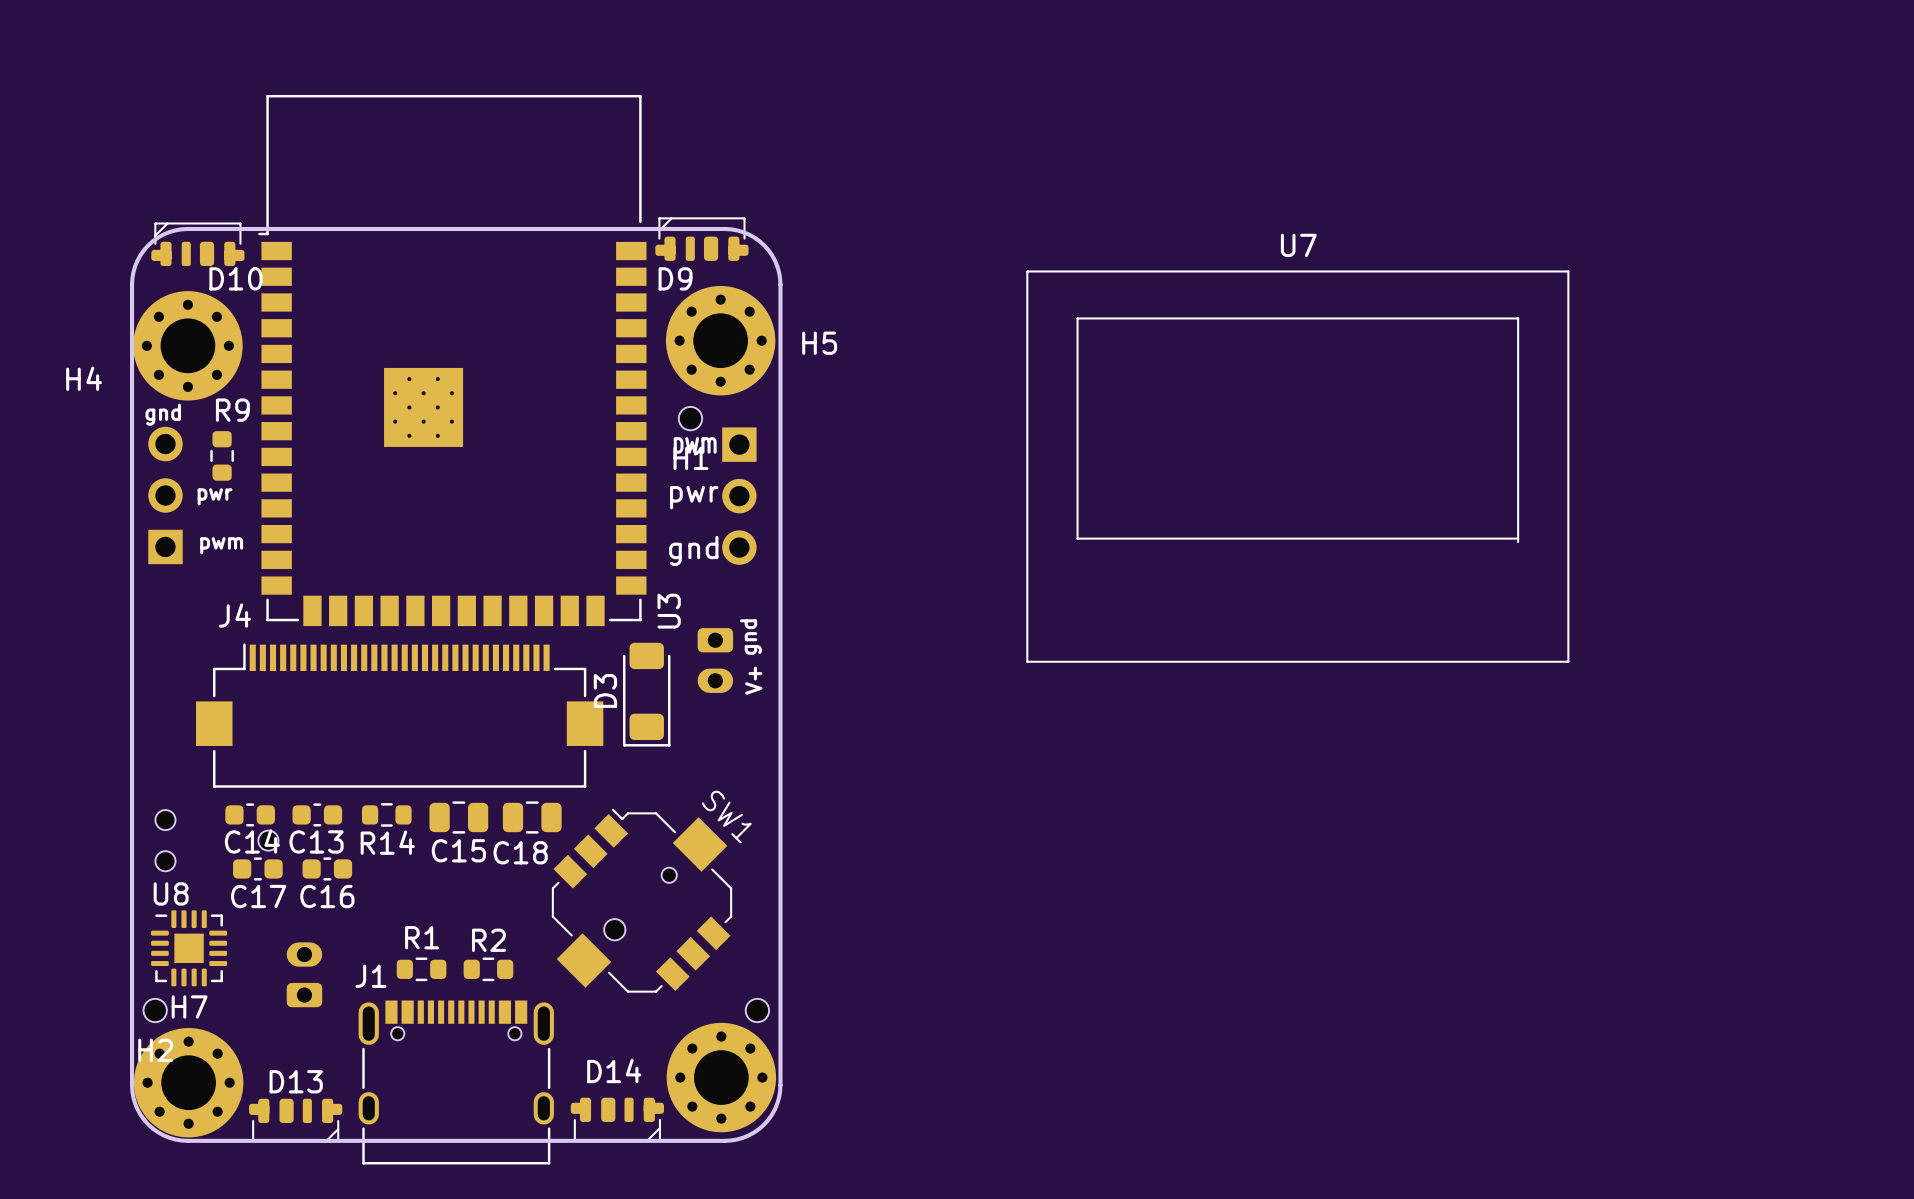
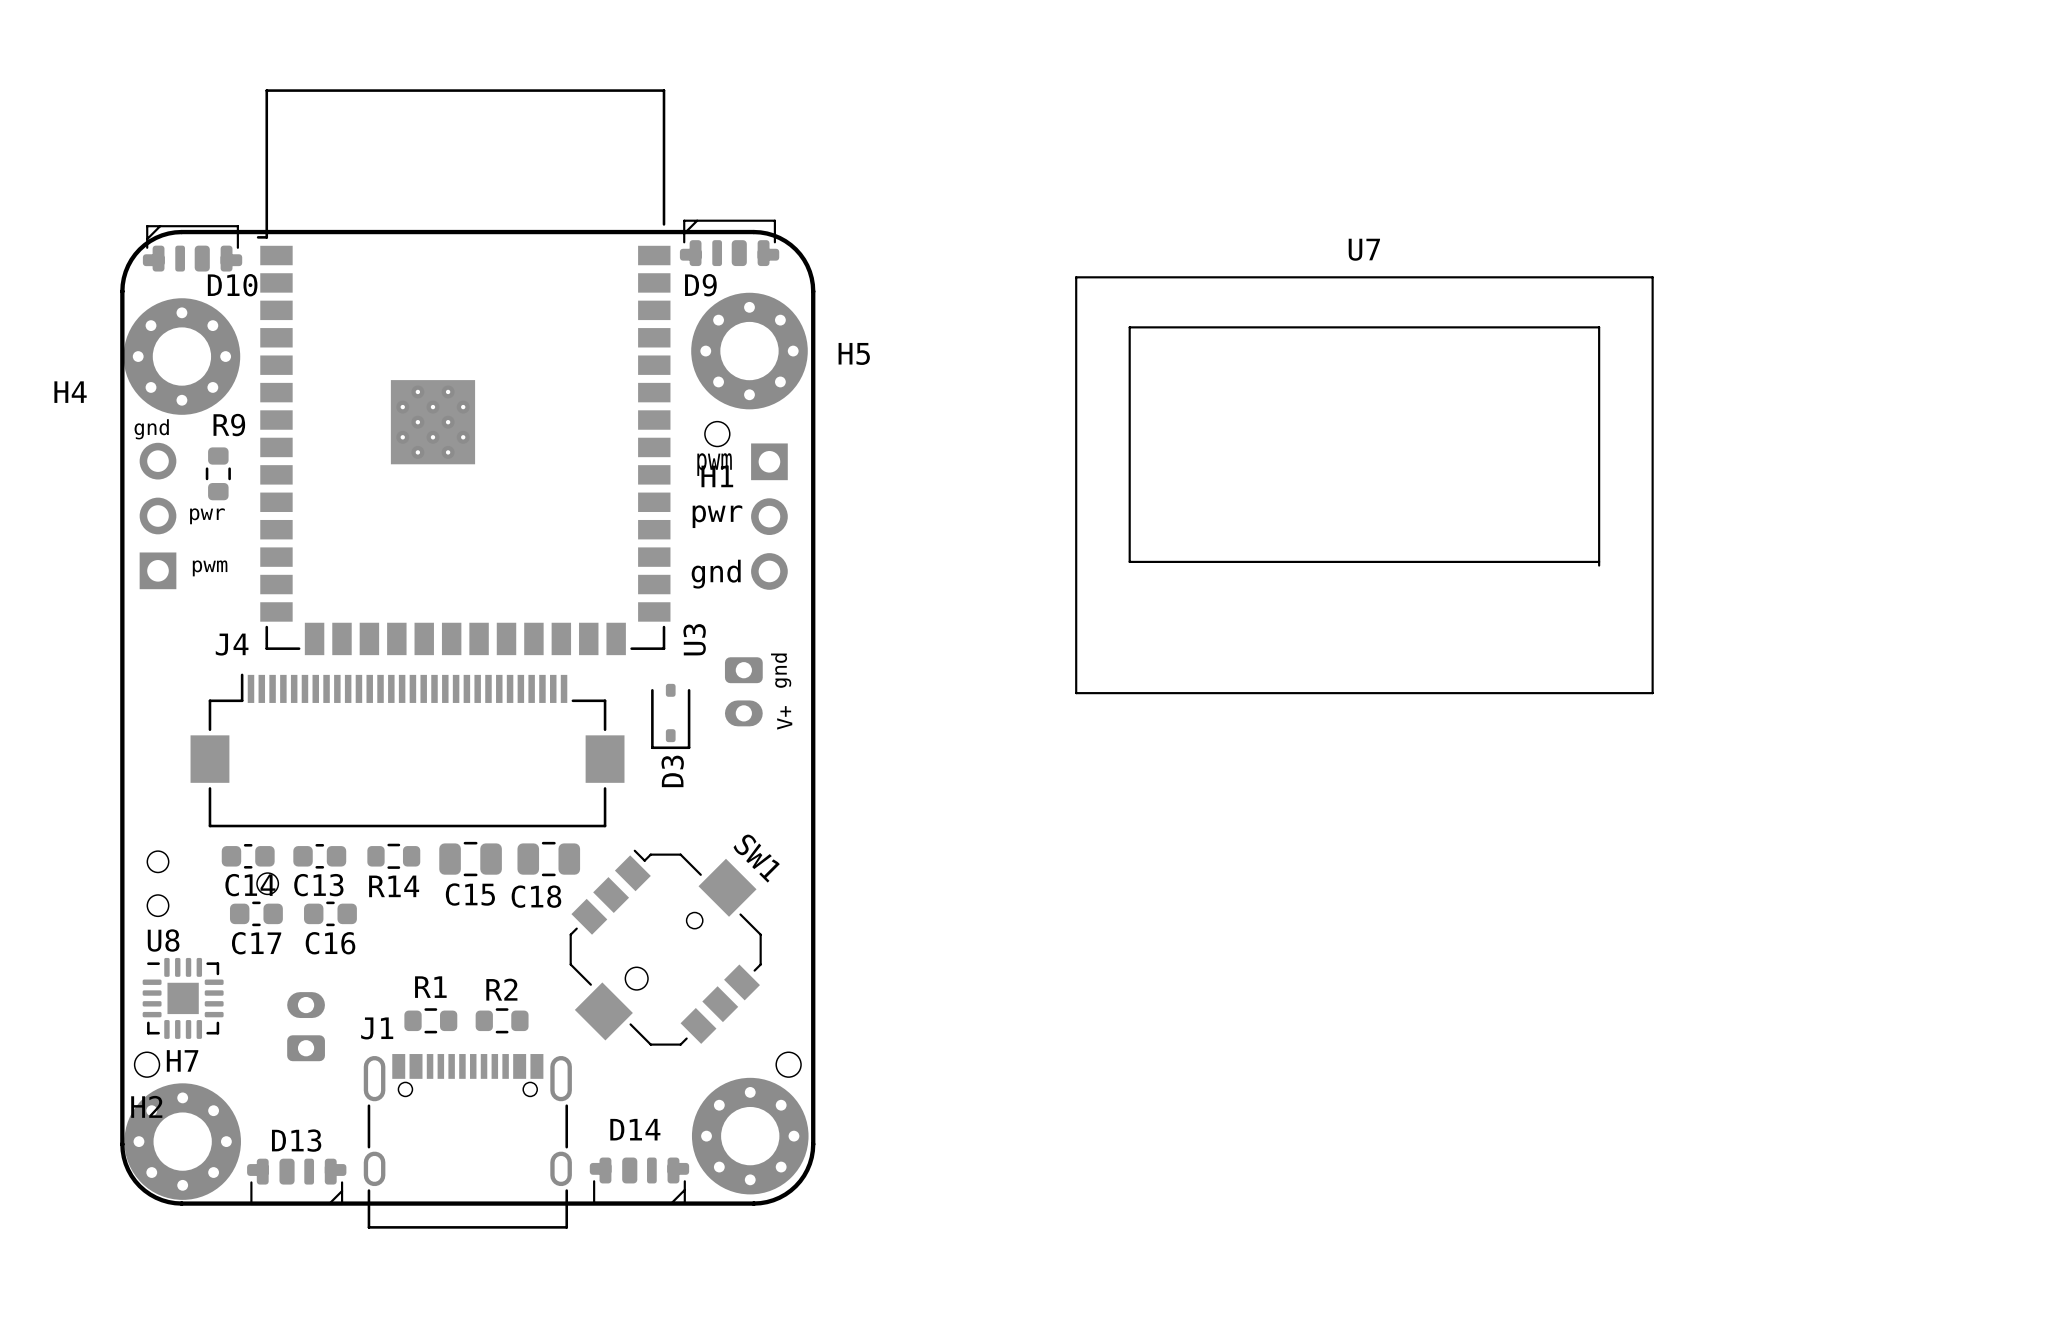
D3 footprint: [623, 642, 671, 747] -> [651, 683, 691, 750]
D3 name position: D3 (605, 690) -> D3 (672, 771)

